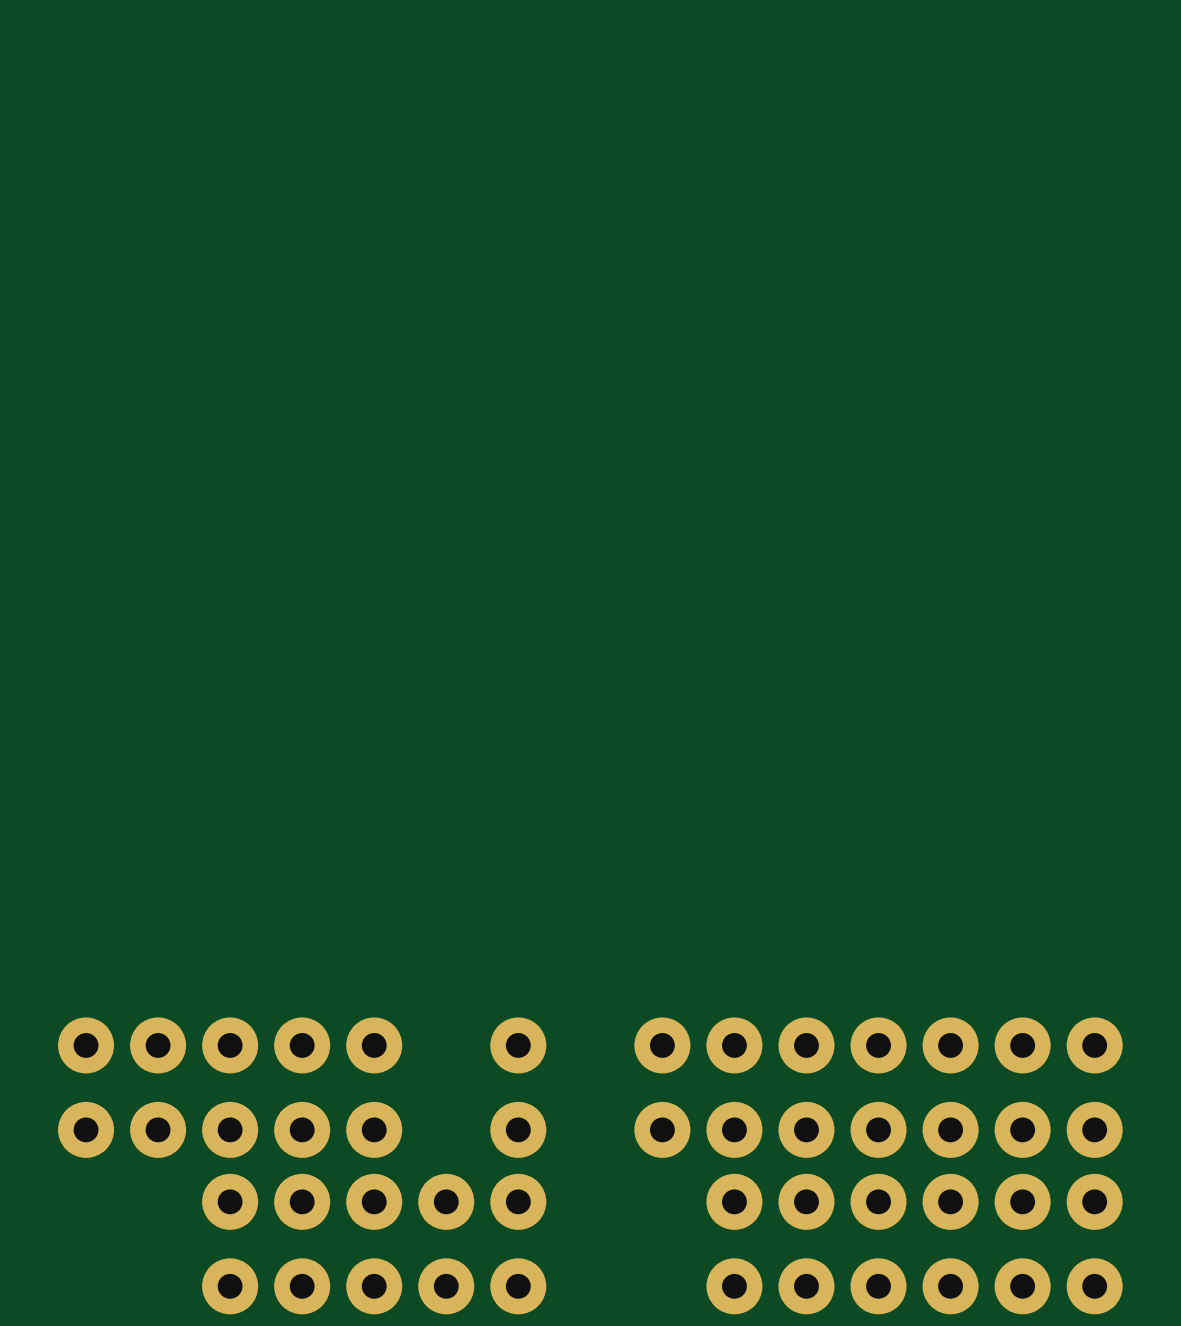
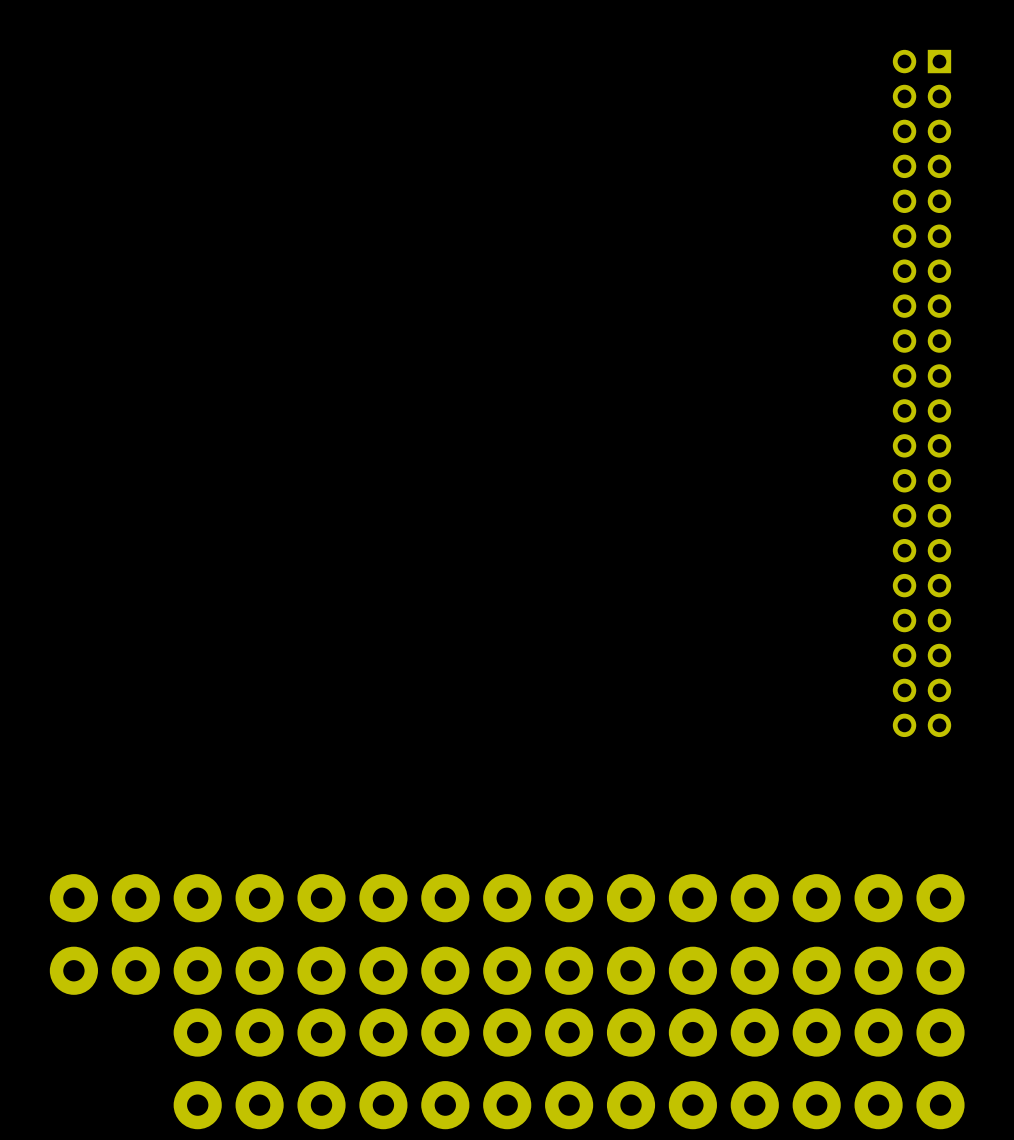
part: none -> (921, 393)
part: none -> (383, 934)
part: none -> (507, 934)
part: none -> (507, 1068)
part: none -> (569, 1068)

